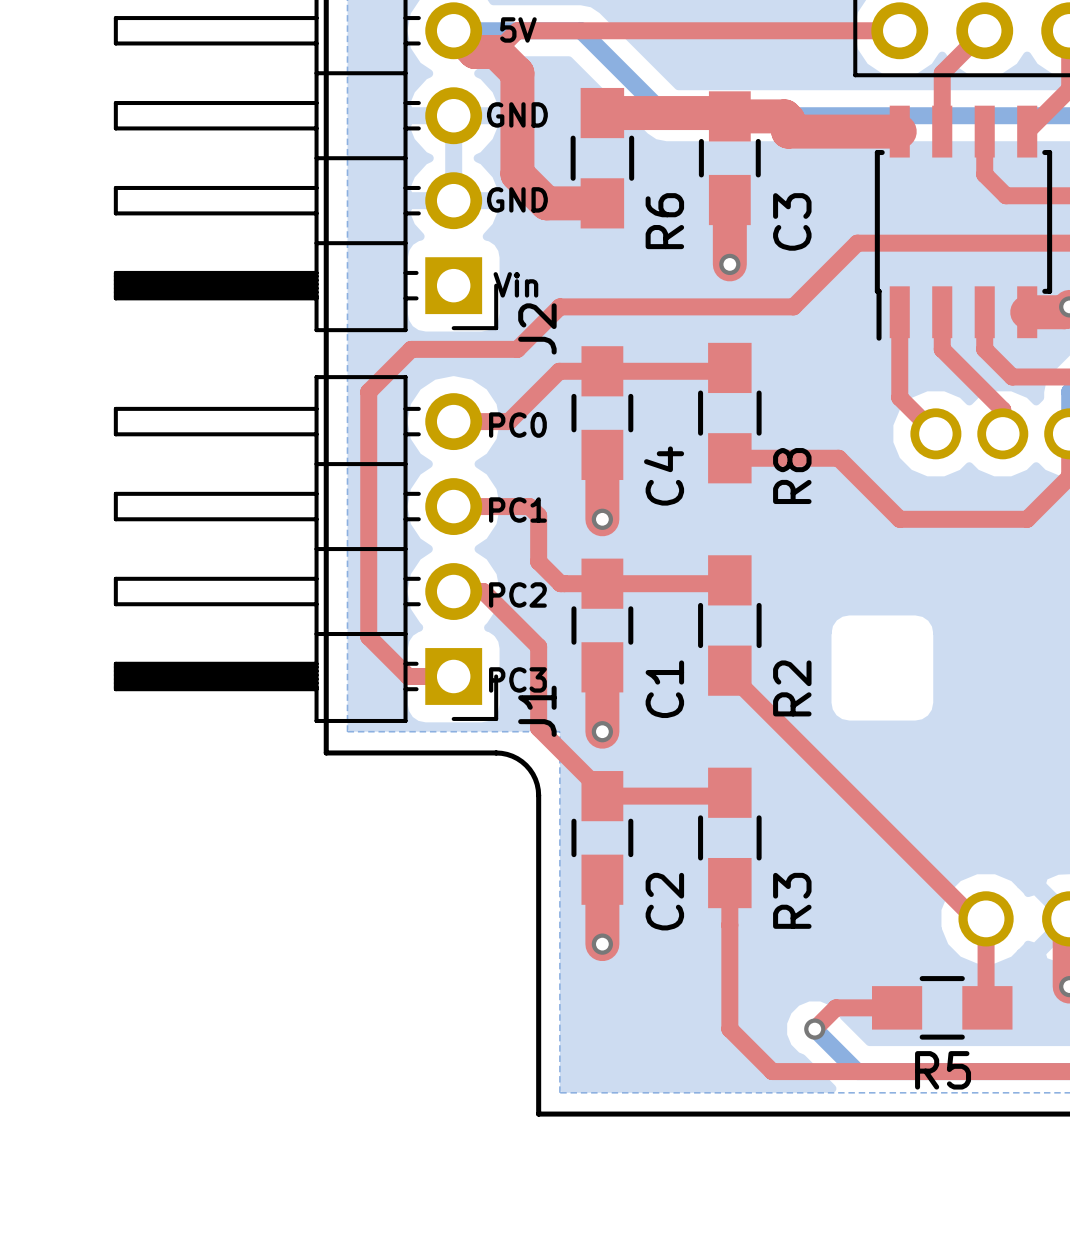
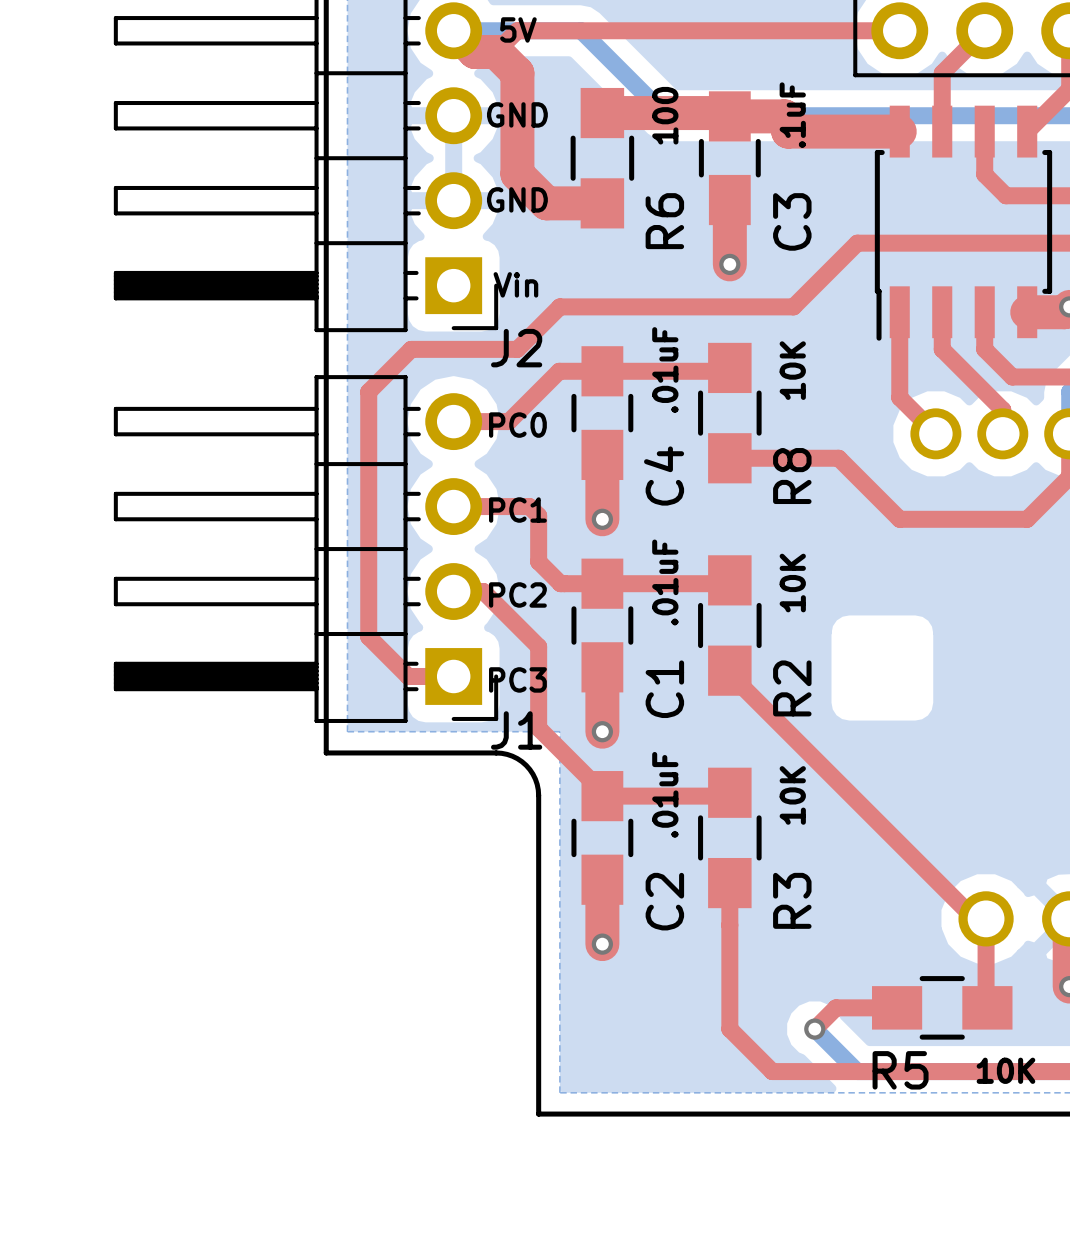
R6 value: none -> 100 (665, 115)
C3 value: none -> .1uF (792, 115)
J2 name rotation: 0° (537, 328) -> 90° clockwise (516, 348)
C4 value: none -> .01uF (665, 370)
R8 value: none -> 10K (792, 370)
C1 value: none -> .01uF (665, 582)
R2 value: none -> 10K (792, 583)
J1 name rotation: 0° (537, 711) -> 90° clockwise (516, 730)
C2 value: none -> .01uF (665, 794)
R3 value: none -> 10K (792, 795)
R5 name position: R5 (943, 1070) -> R5 (900, 1070)
R5 value: none -> 10K (1005, 1070)

